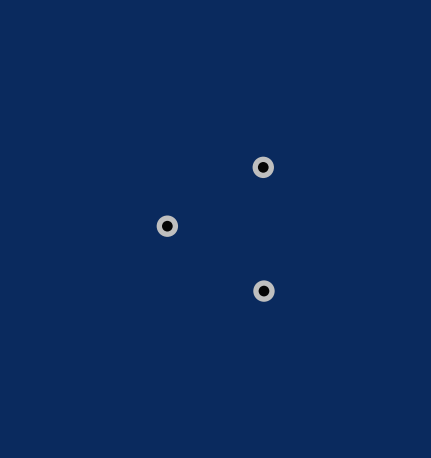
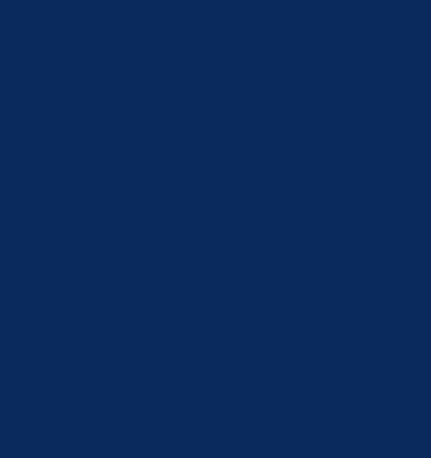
via: (263, 167) -> none
via: (167, 226) -> none
via: (263, 291) -> none

